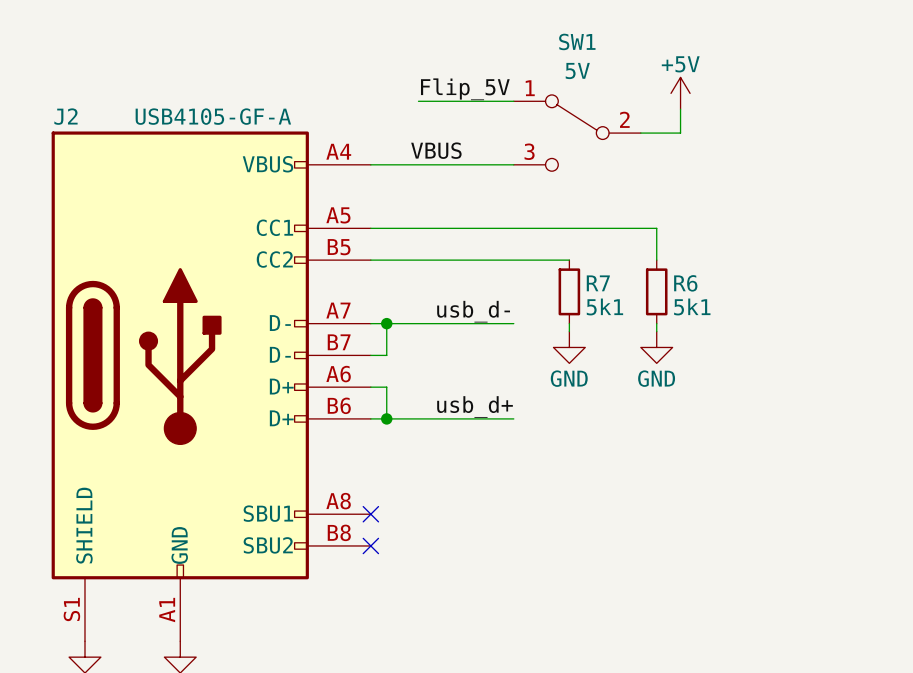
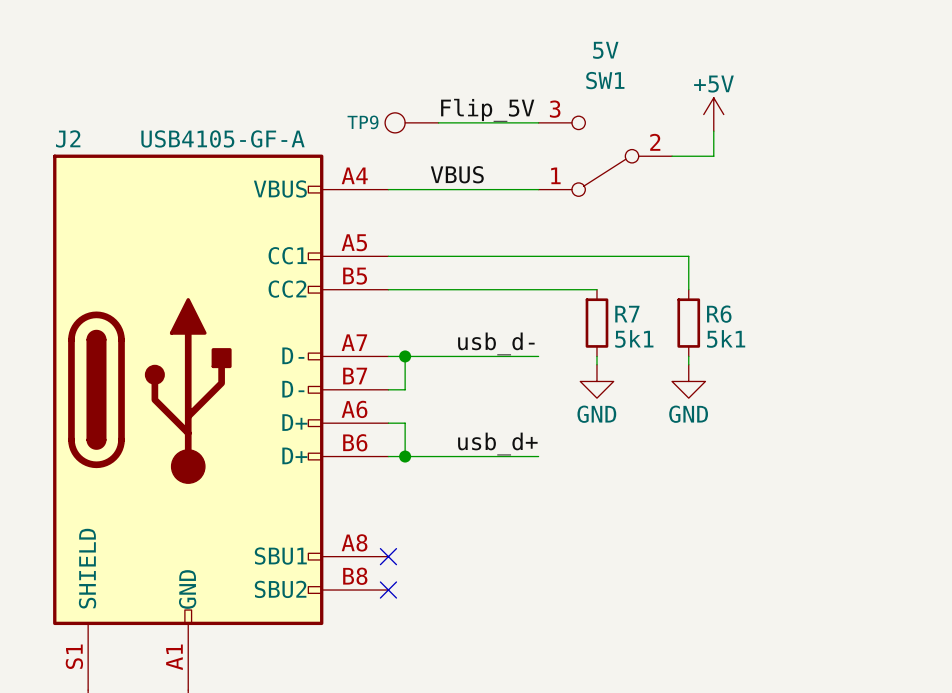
SW1 value position: 5V (577, 71) -> 5V (605, 50)
TP9: none -> (411, 122)
SW1 flip: as is (577, 133) -> up-down (605, 156)

